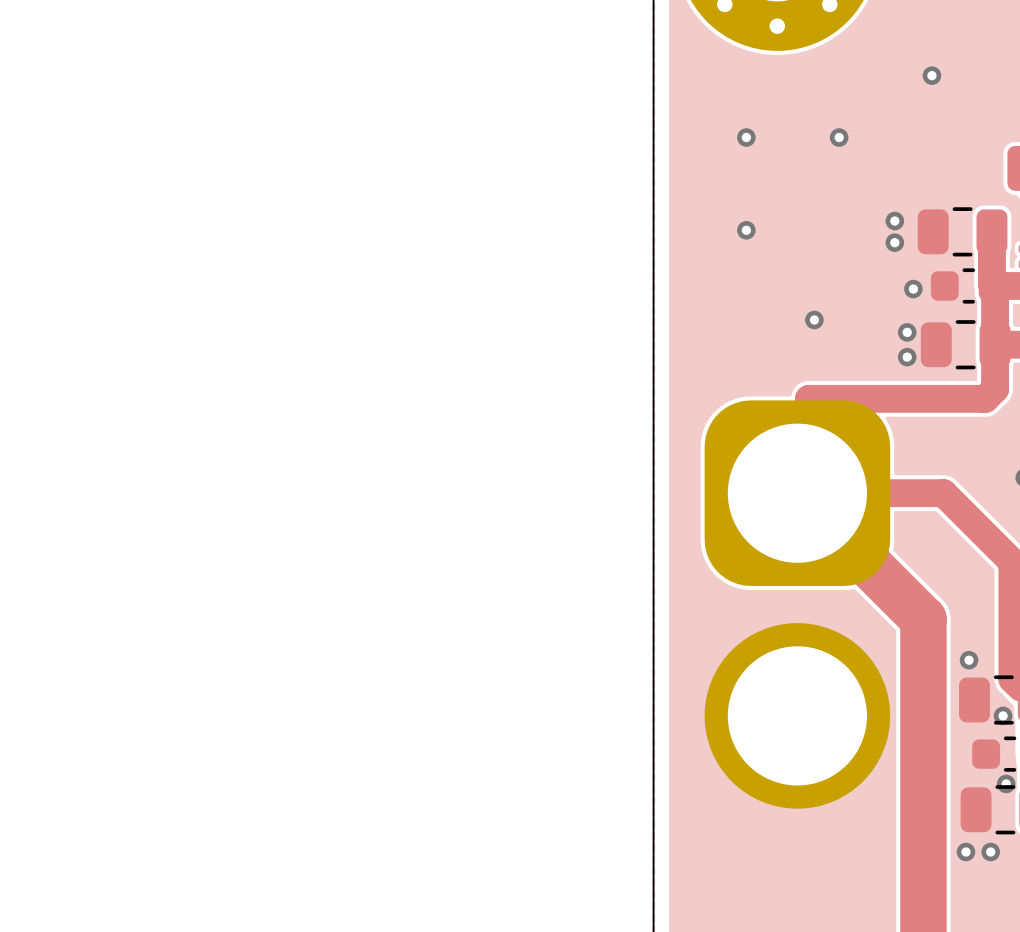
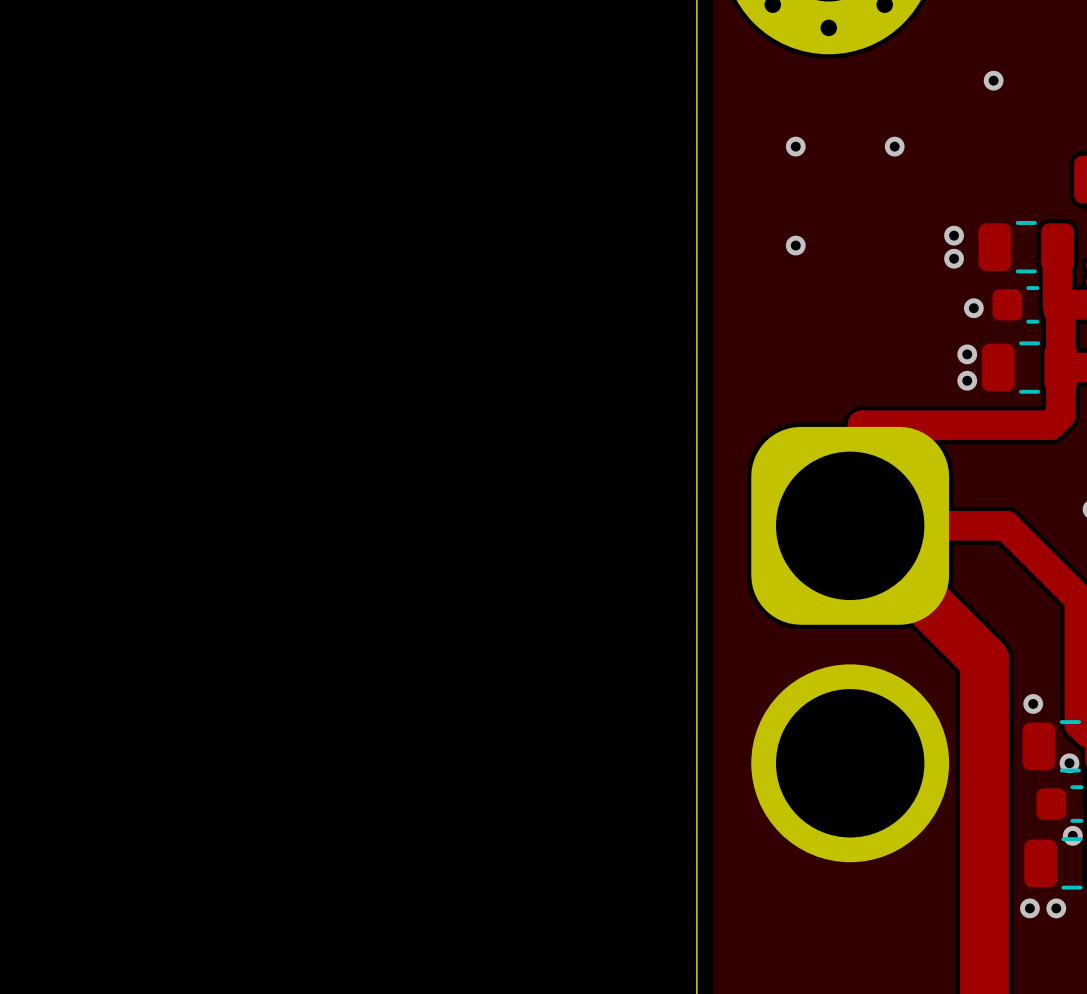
via: (814, 320) -> none

